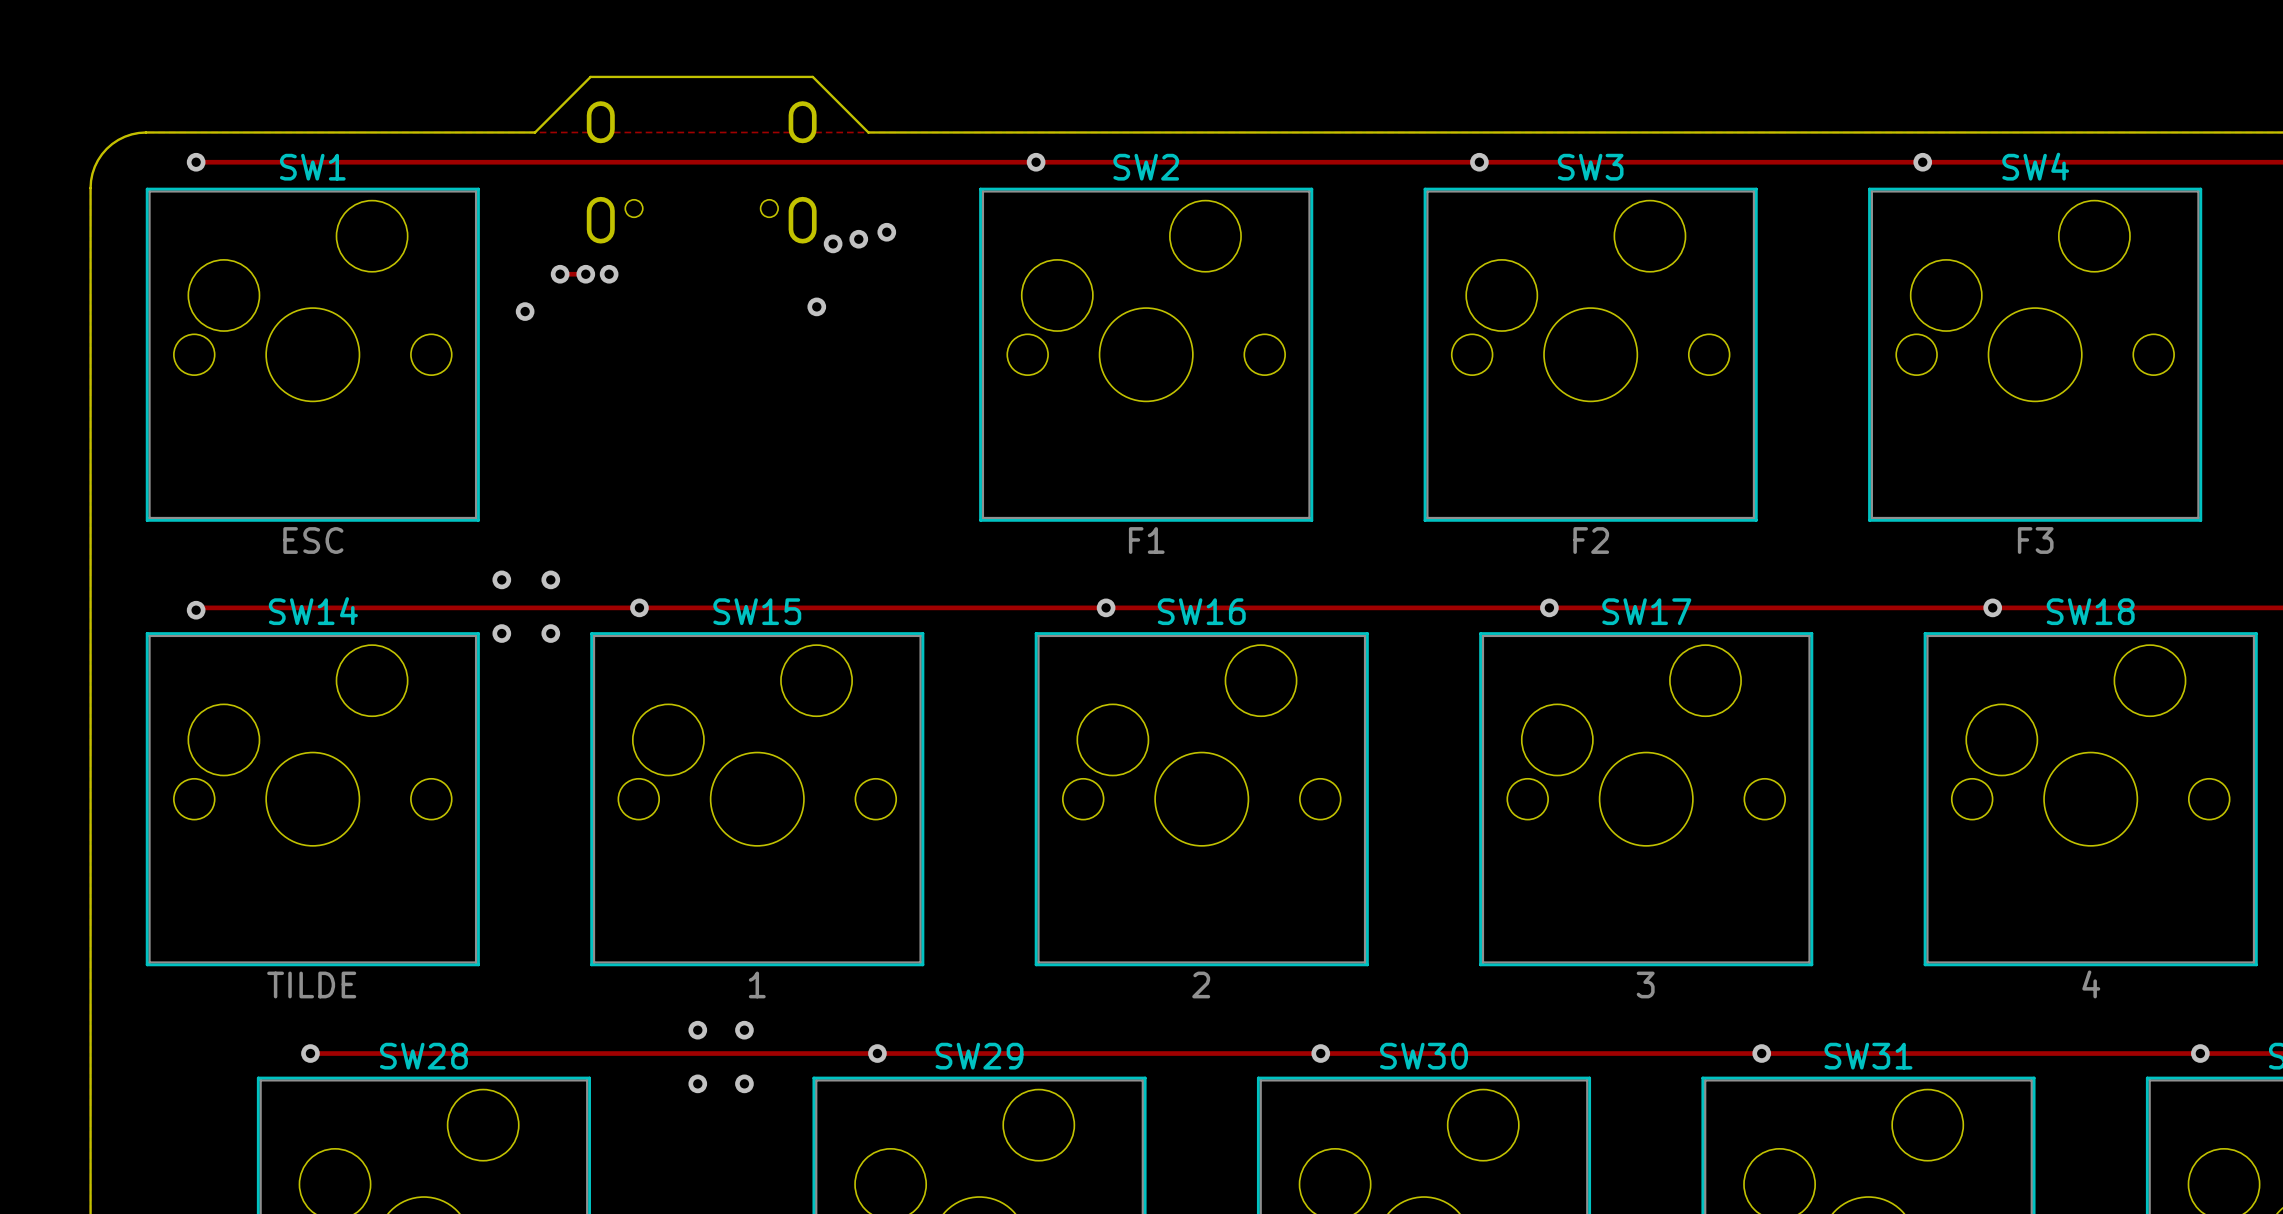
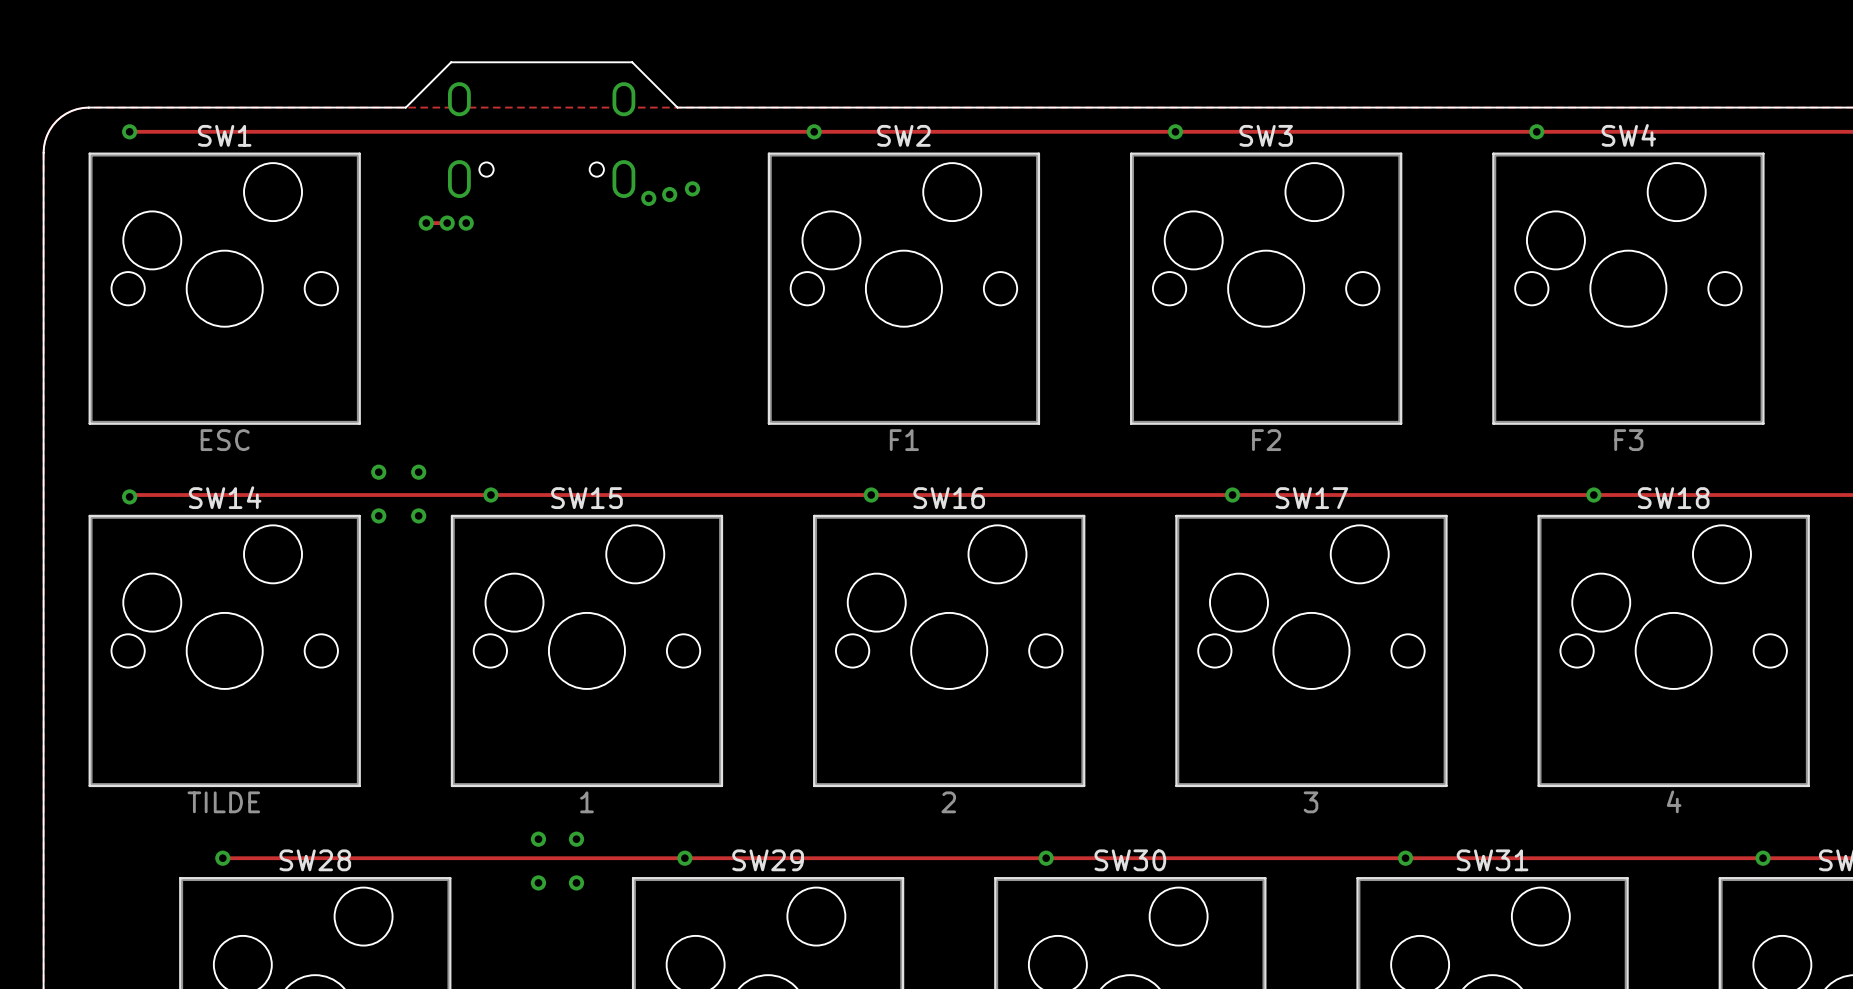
via: (816, 306) -> none
via: (525, 311) -> none

